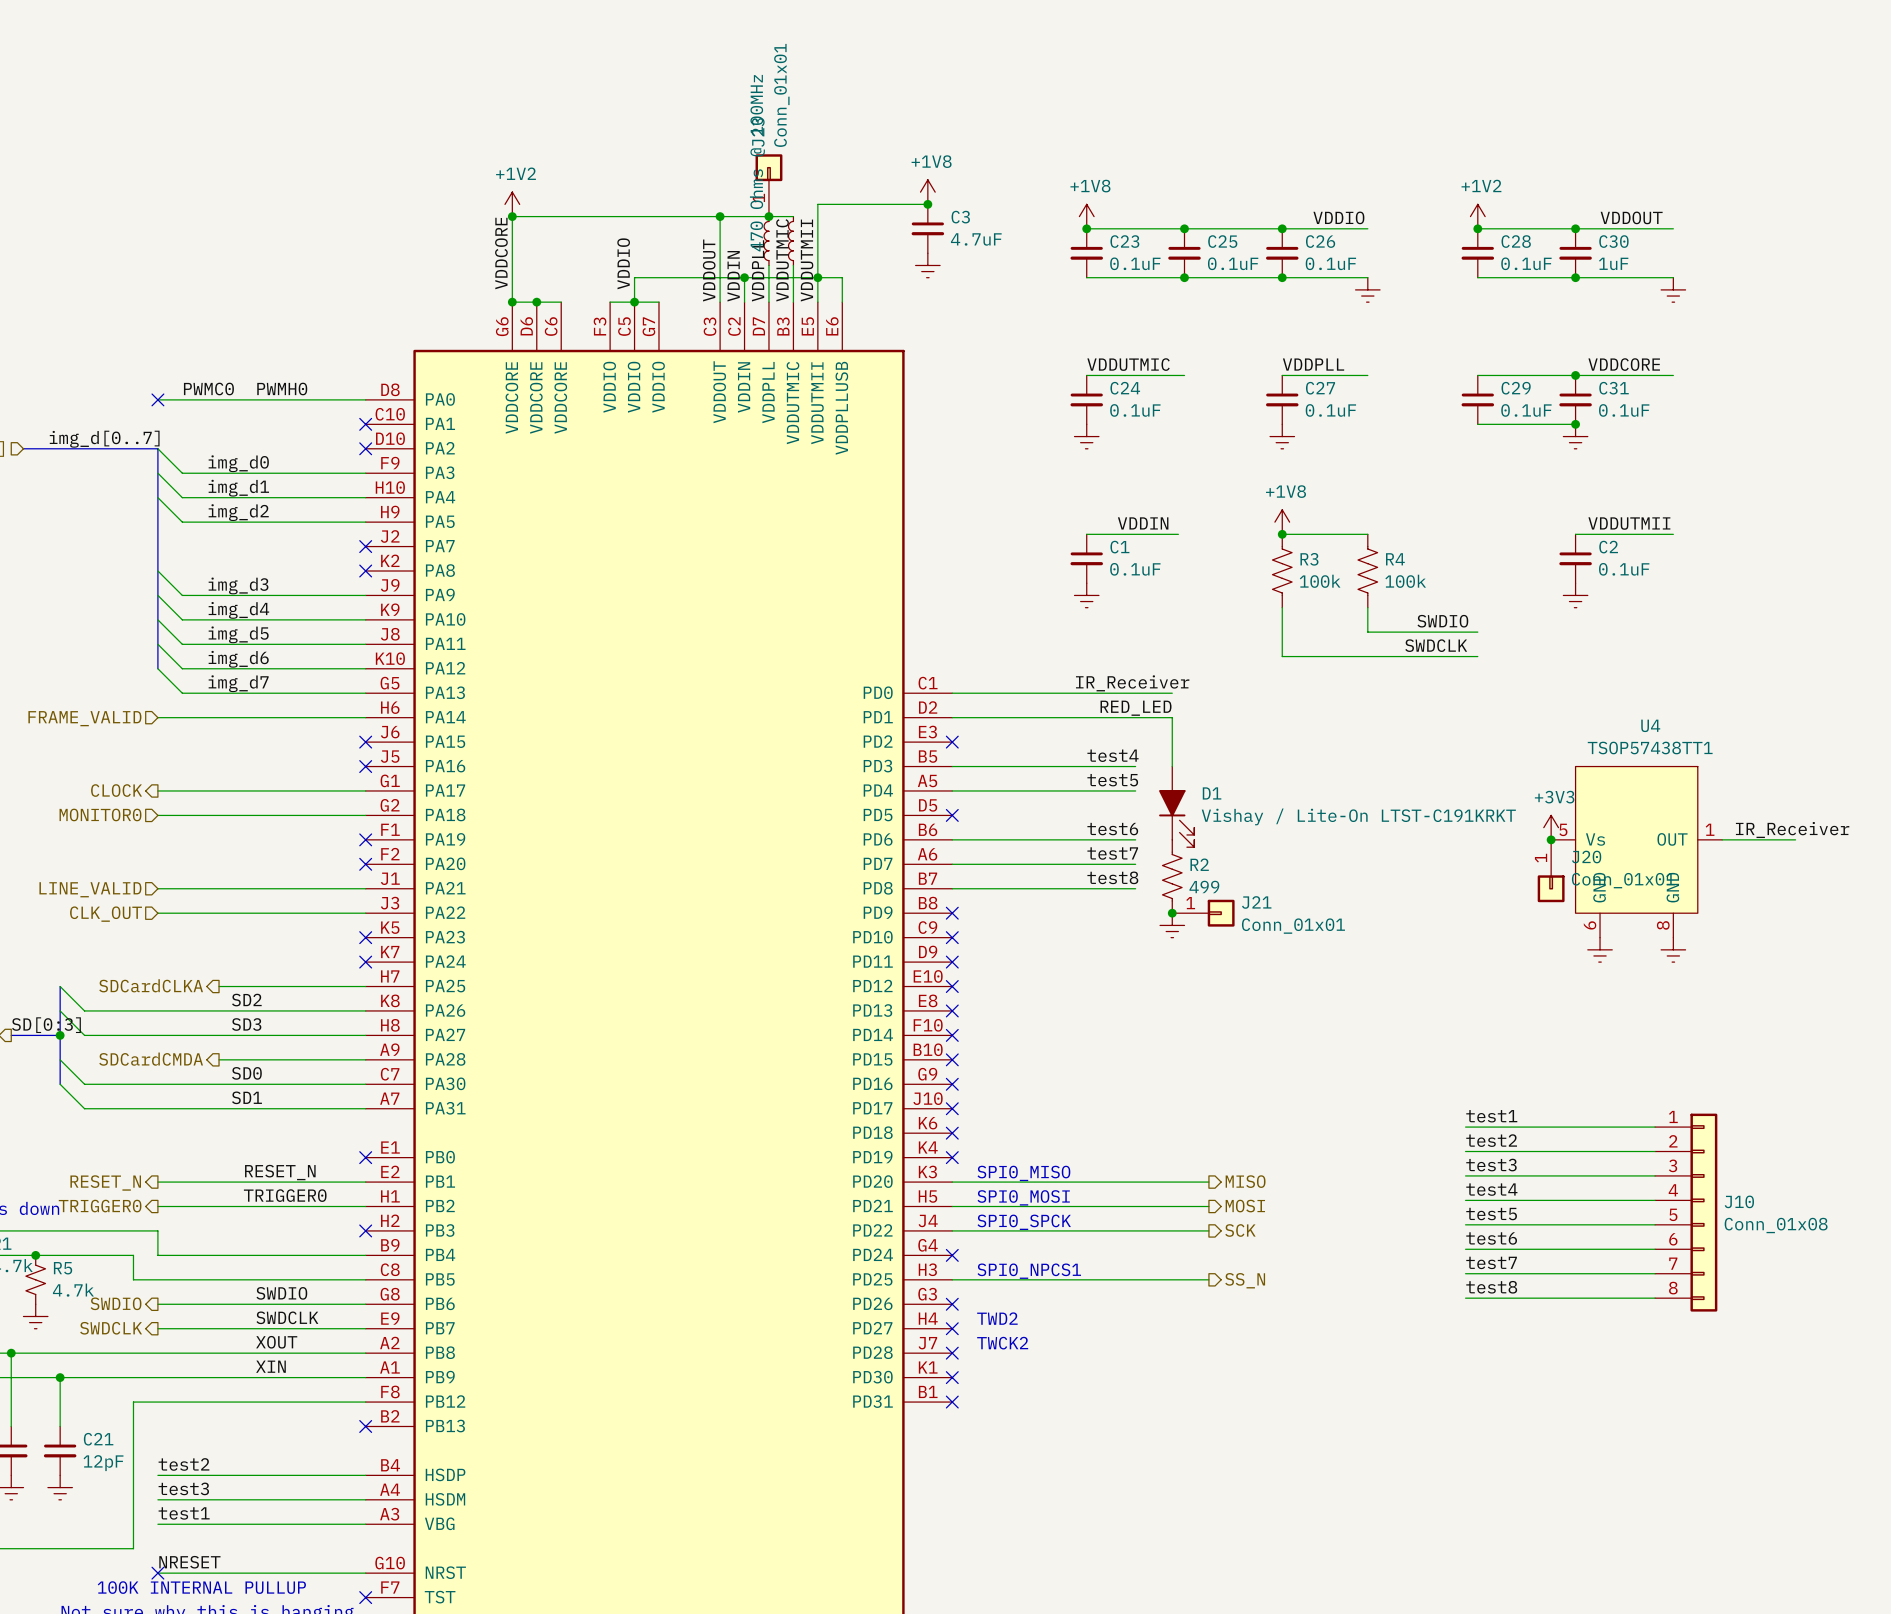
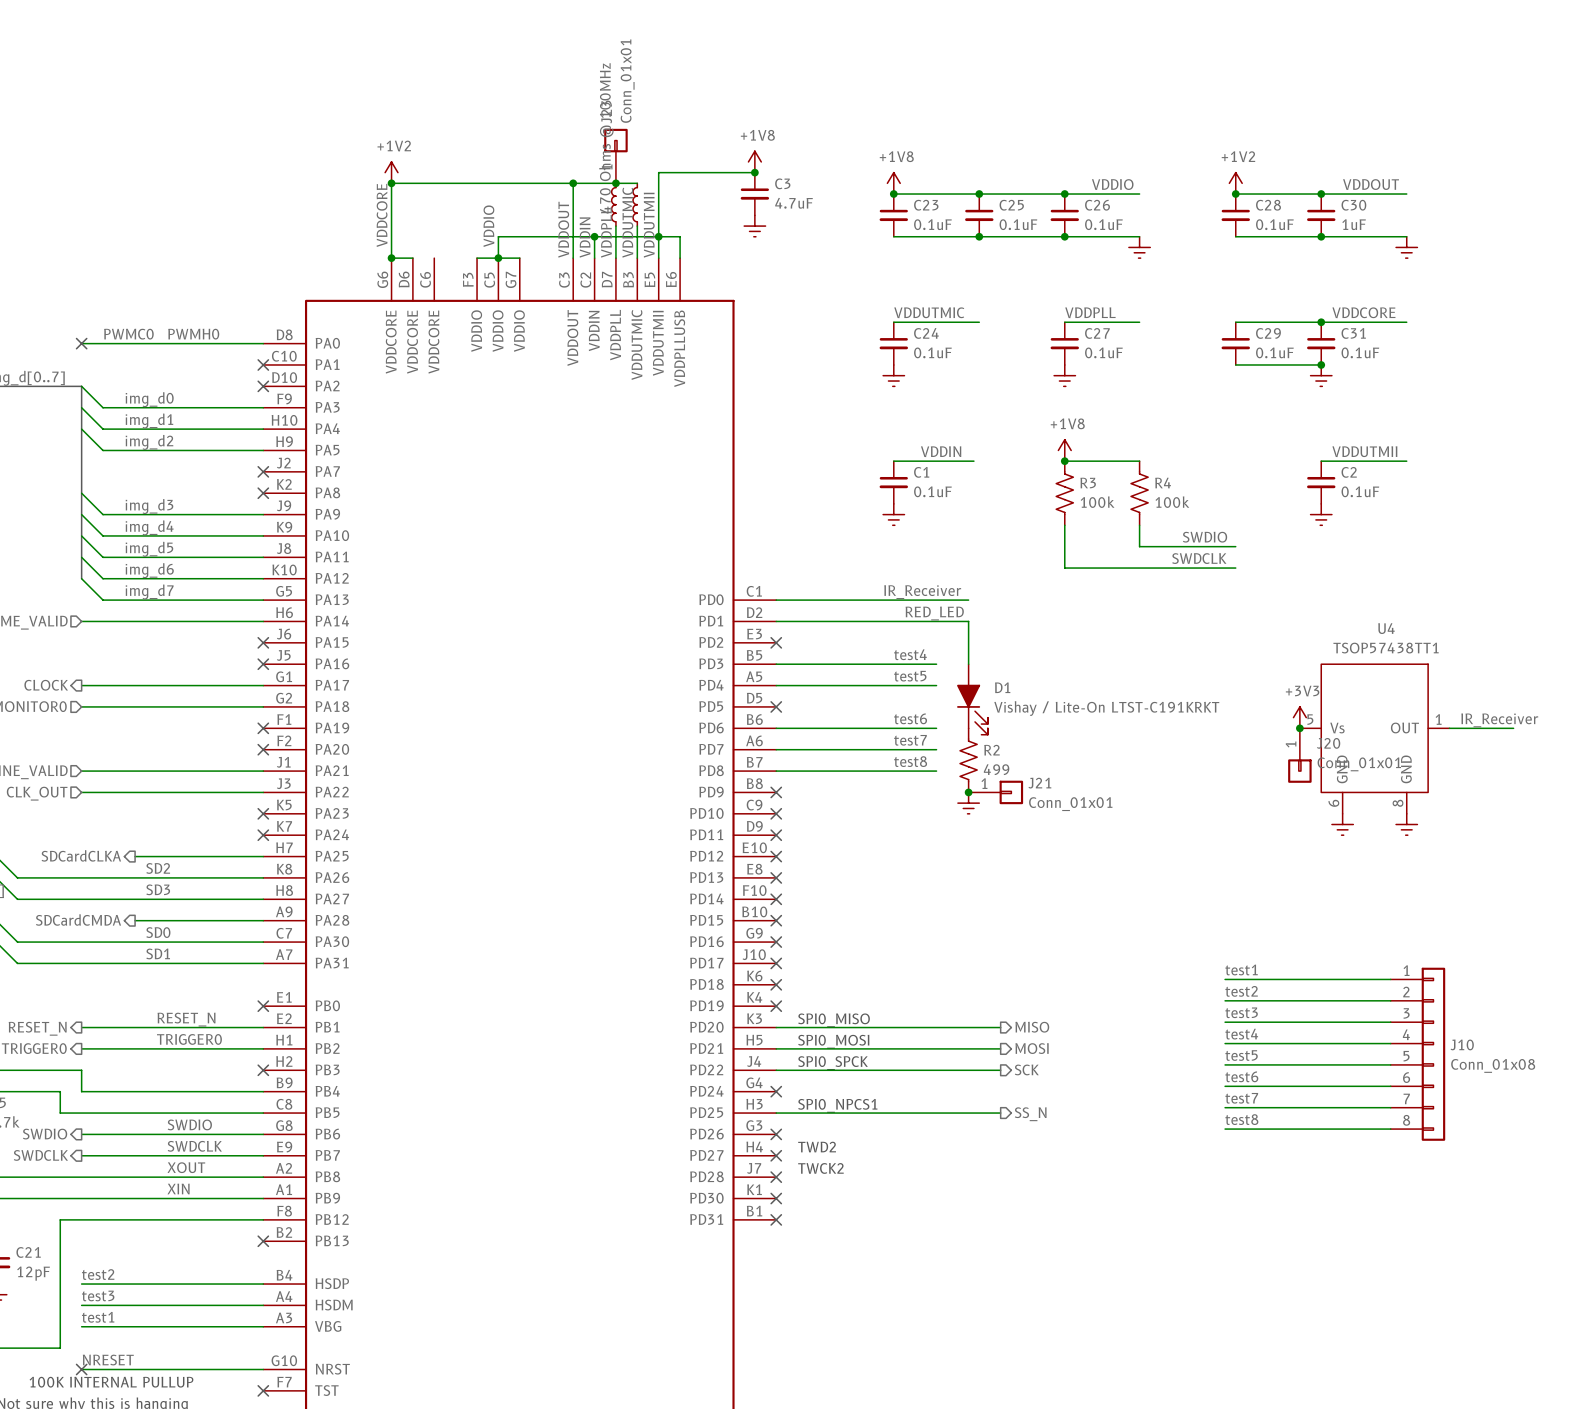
wire: (536, 302) (561, 302) -> none
junction: (536, 302) -> none

